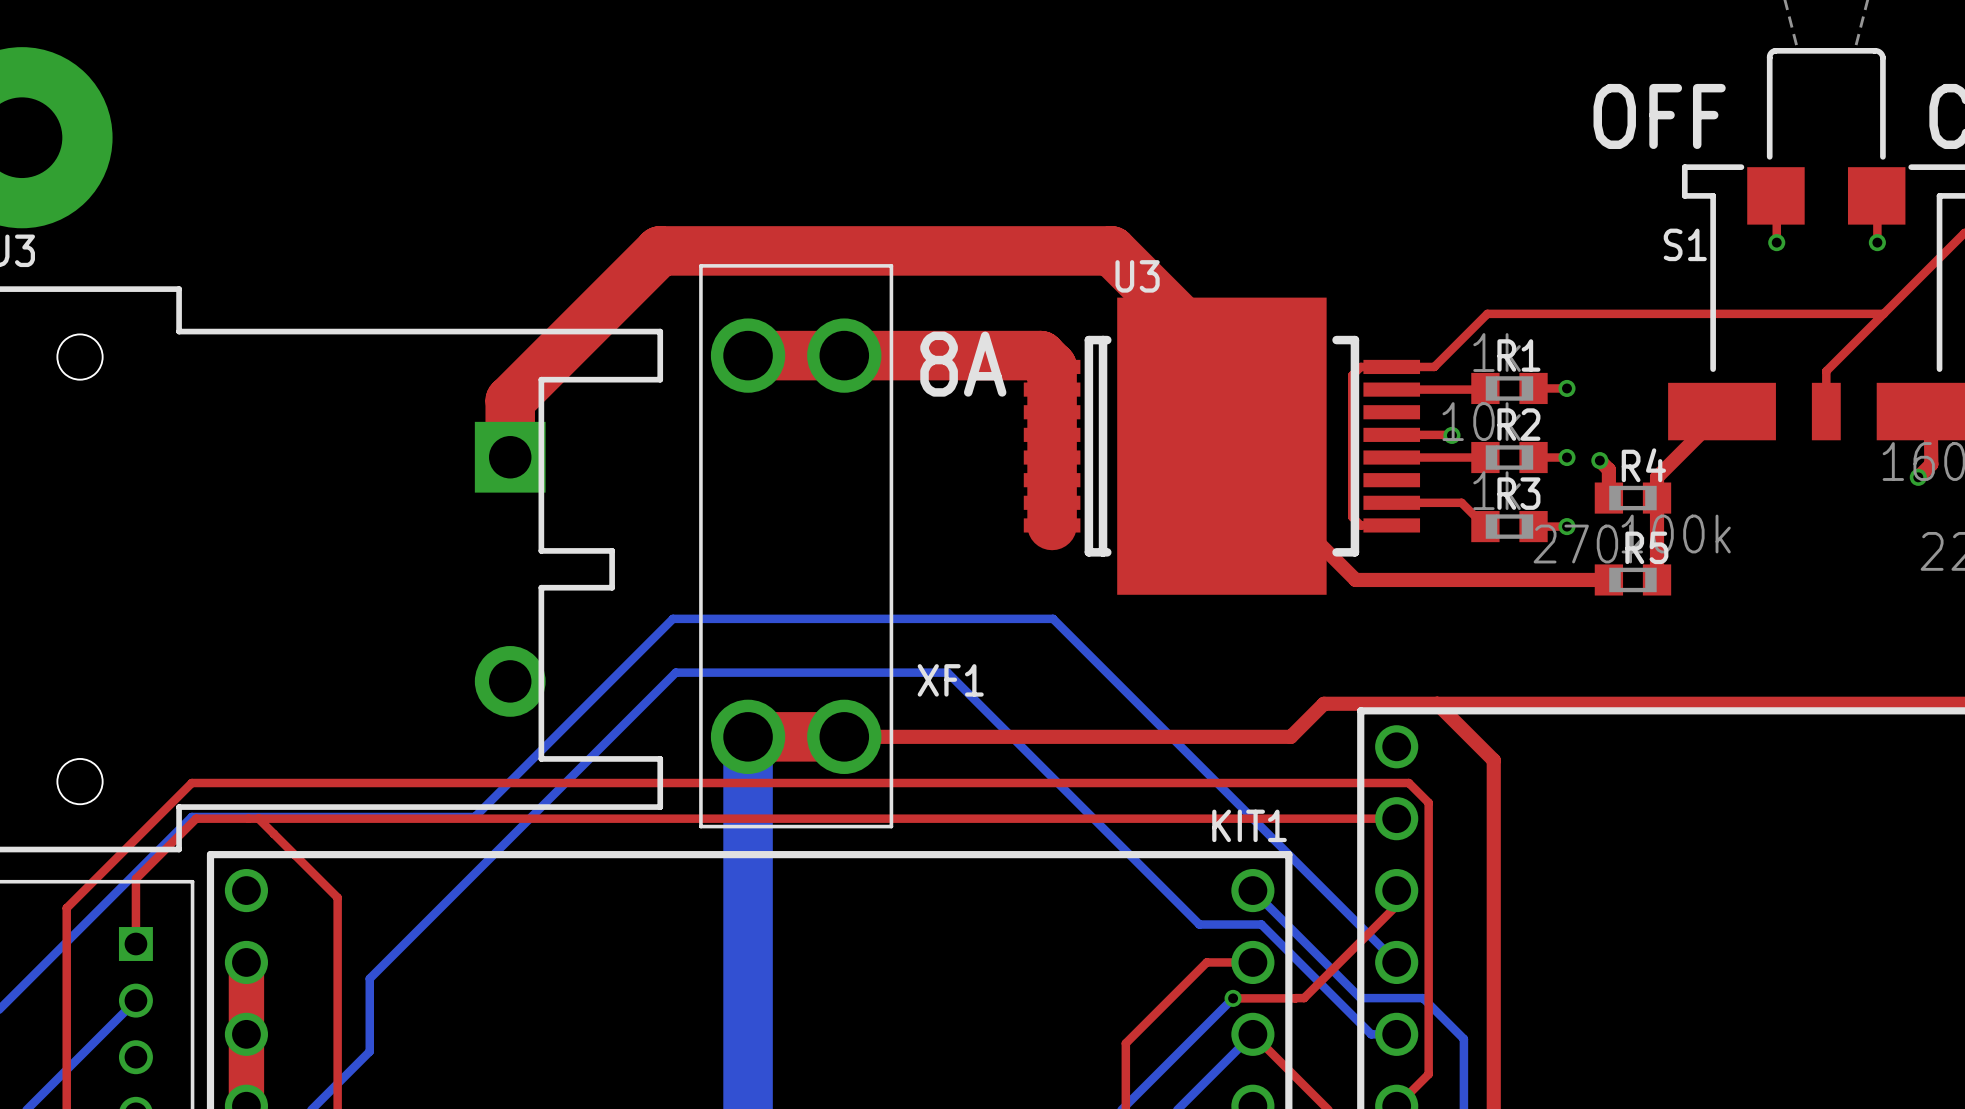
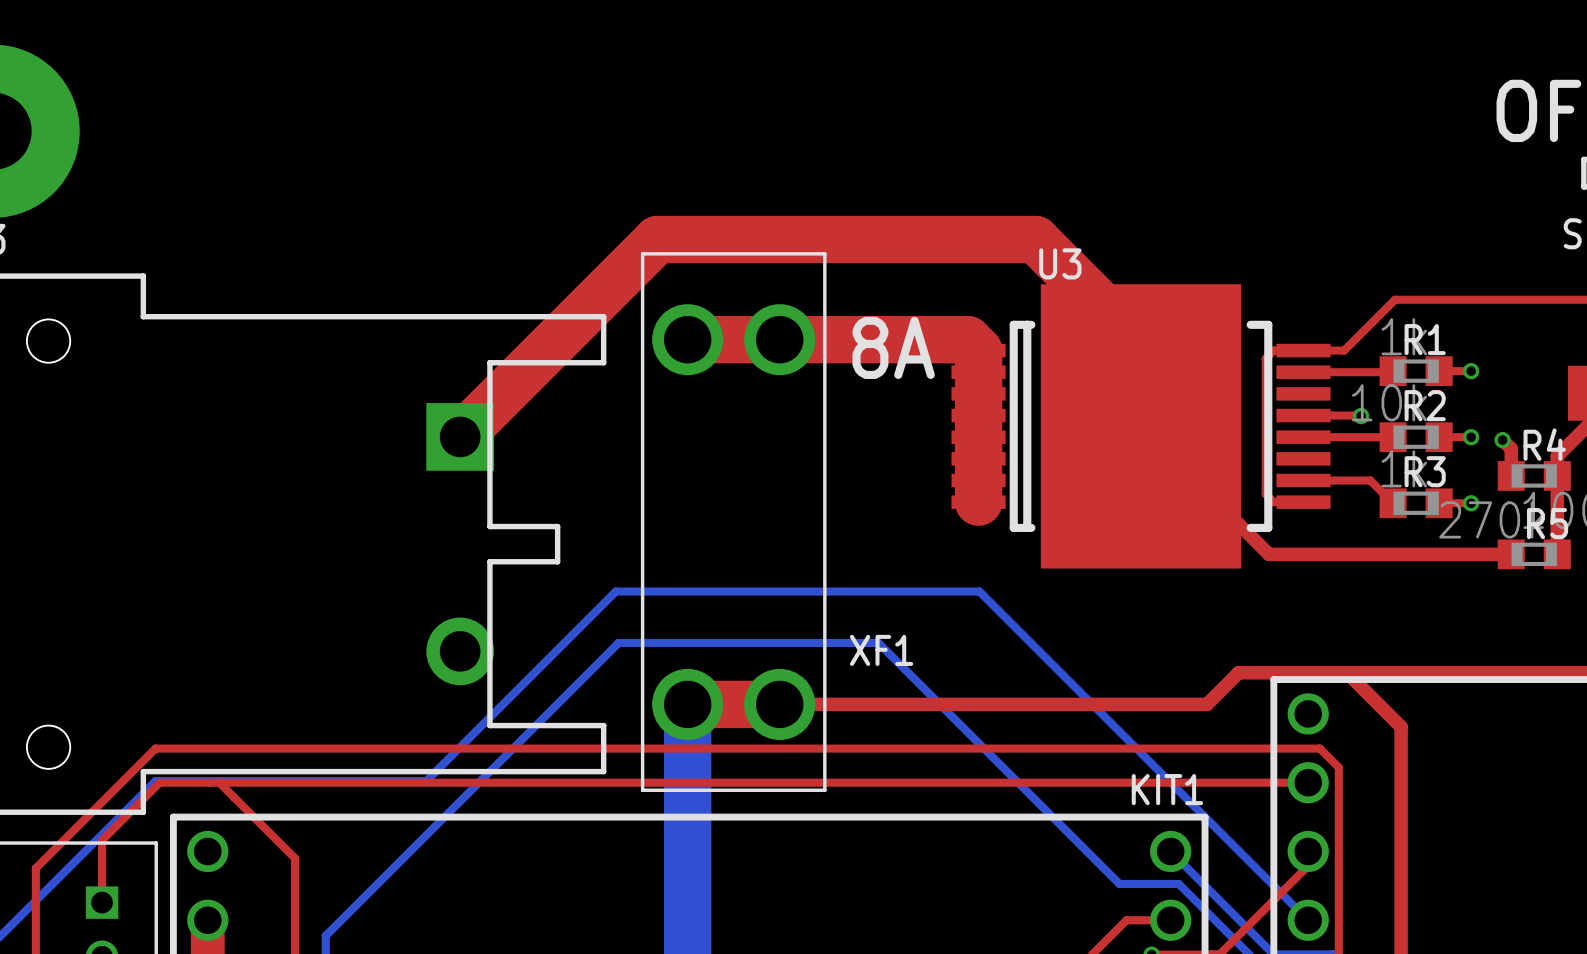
top track: (716, 250) (659, 250) (510, 400) (510, 457) -> (657, 239) (460, 436)

